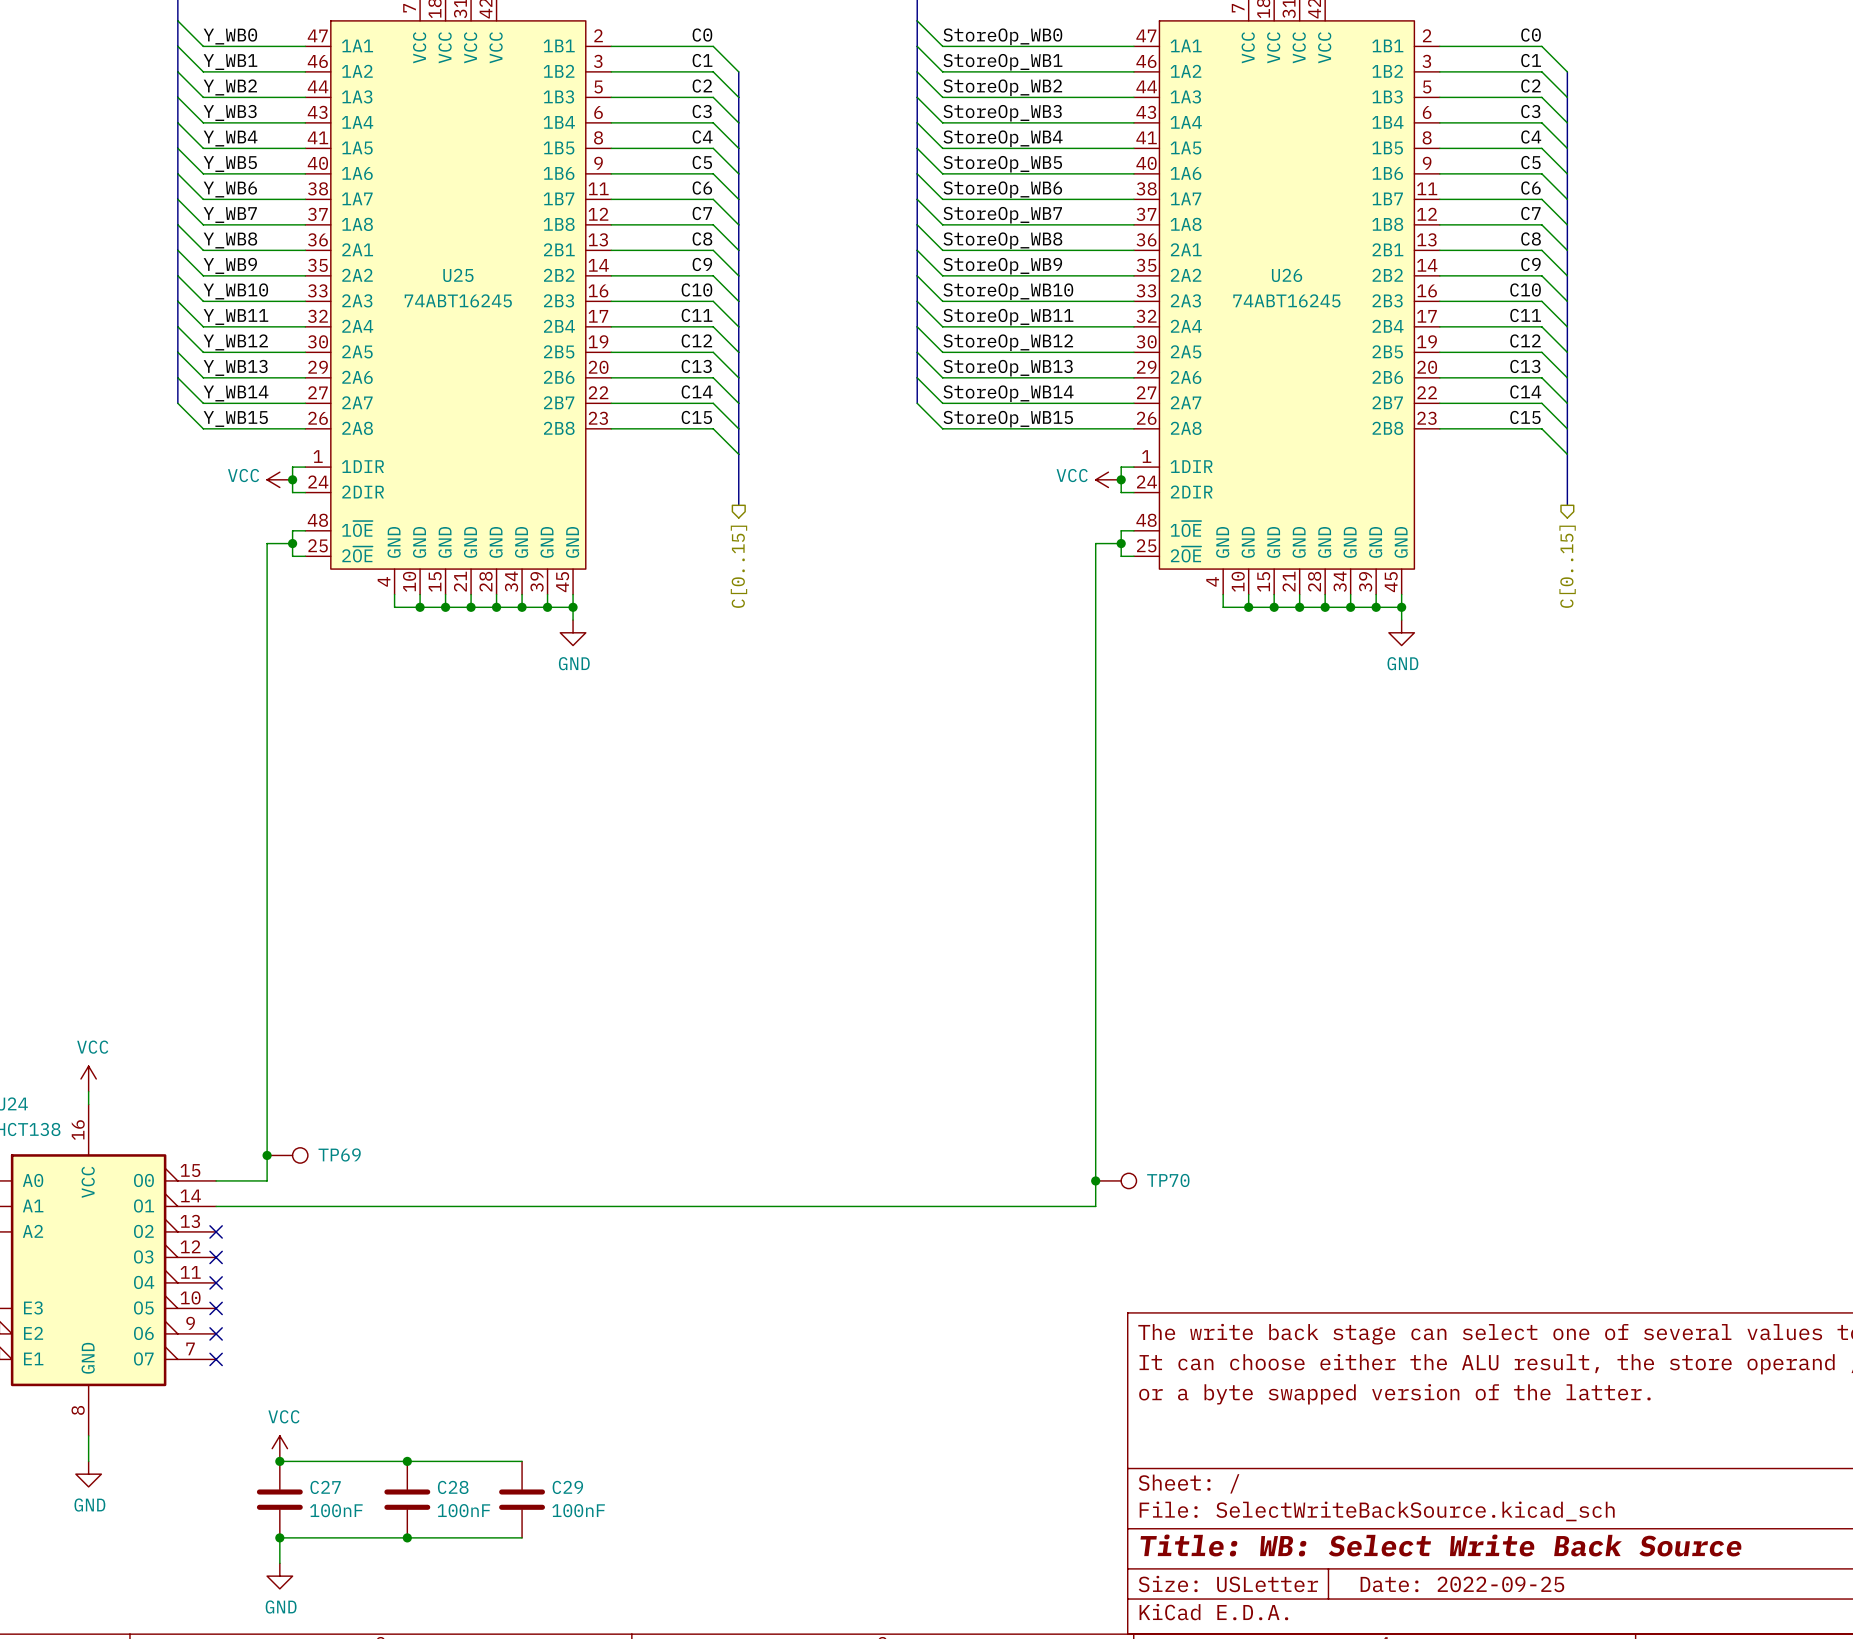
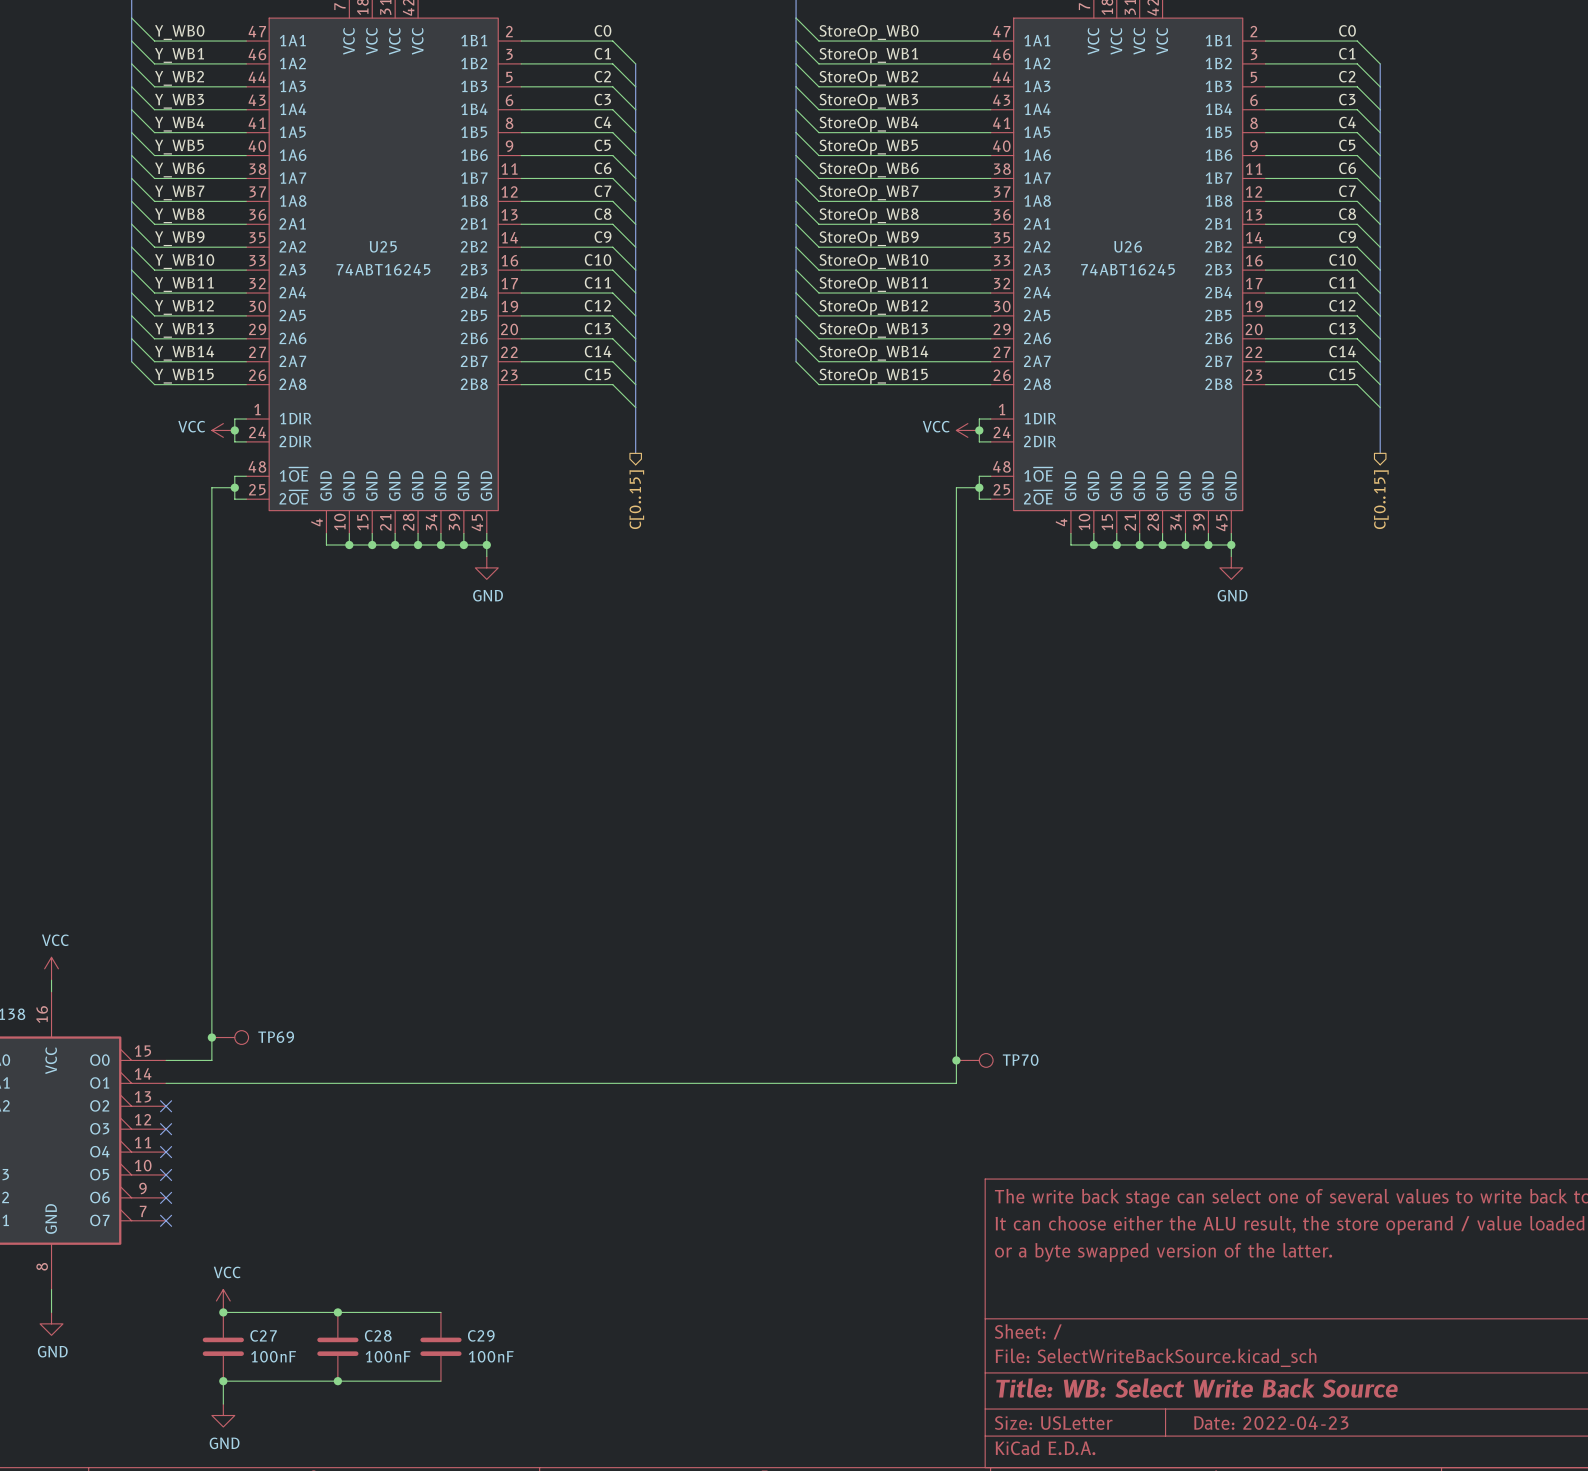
title block: Date: 2022-09-25 (1462, 1584) -> Date: 2022-04-23 (1271, 1423)

